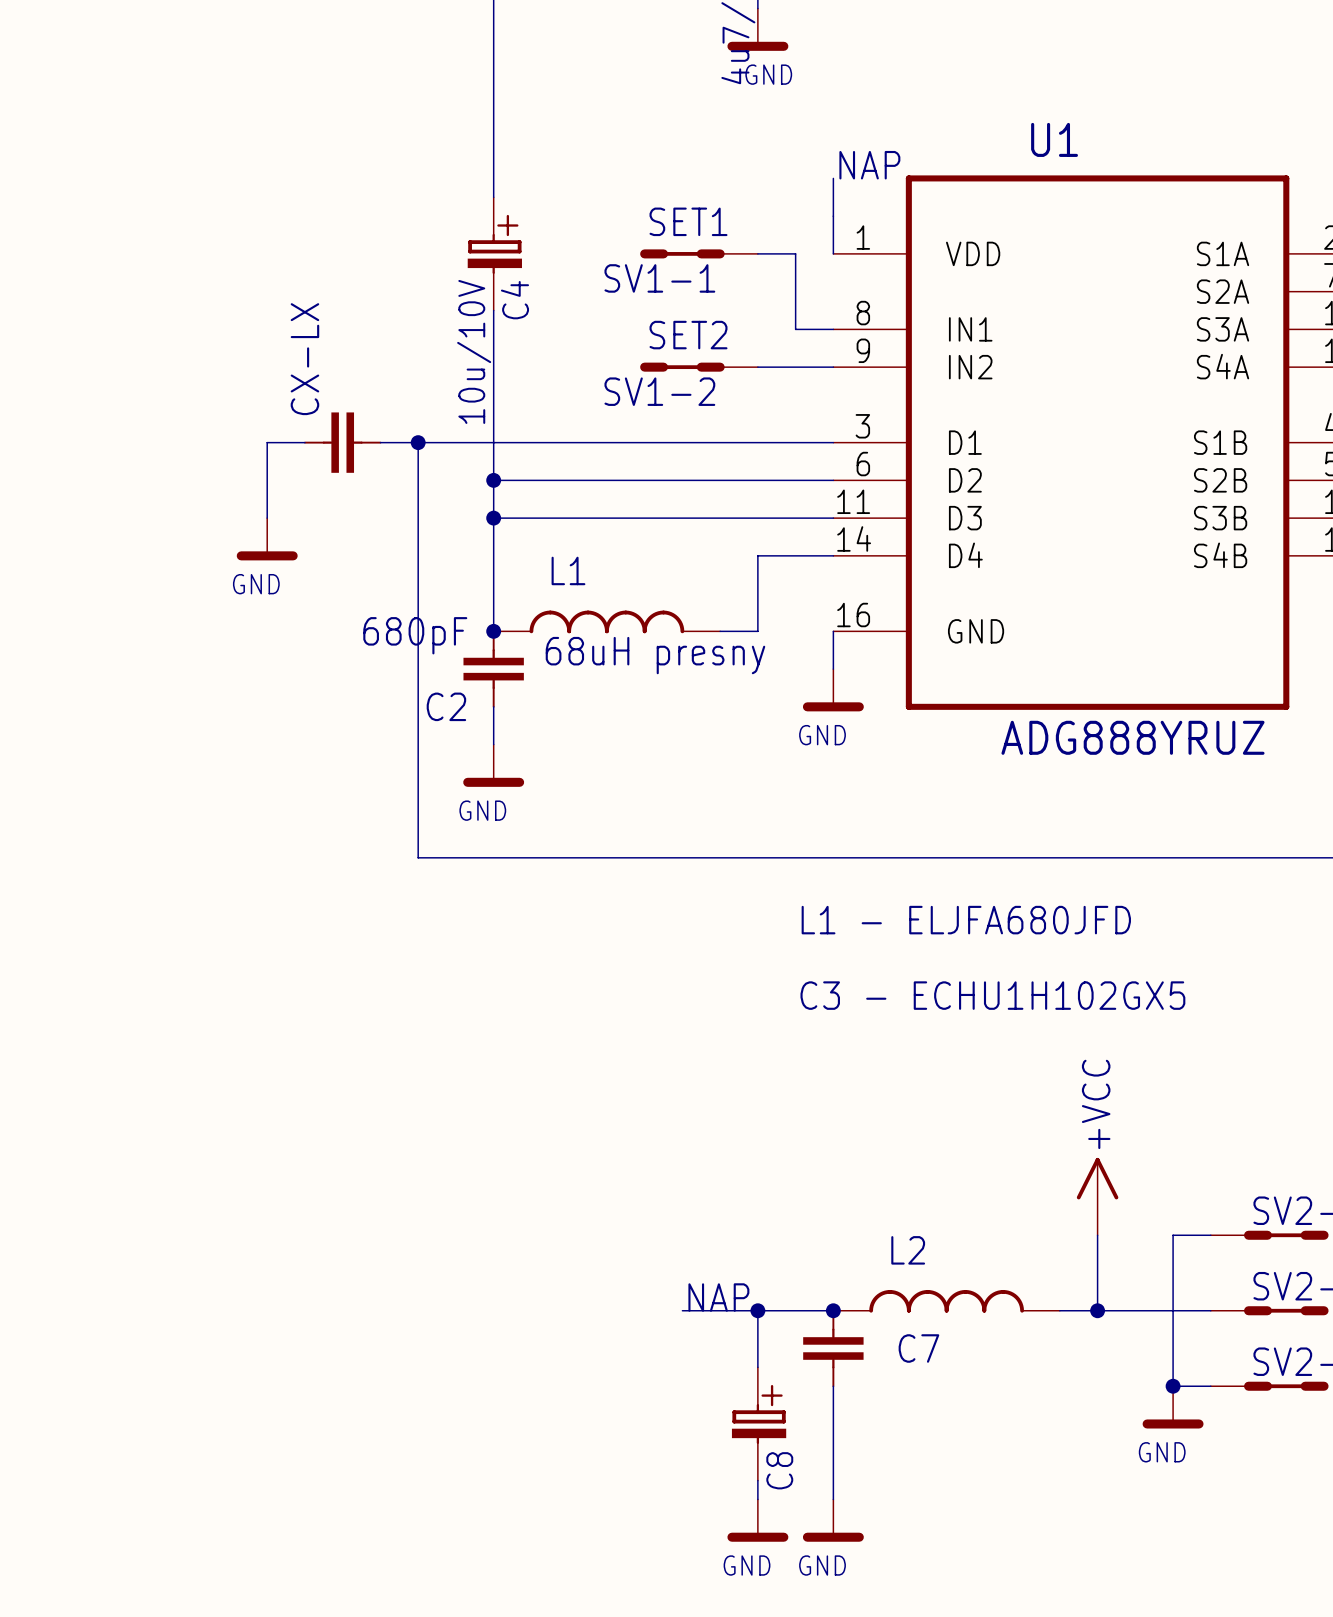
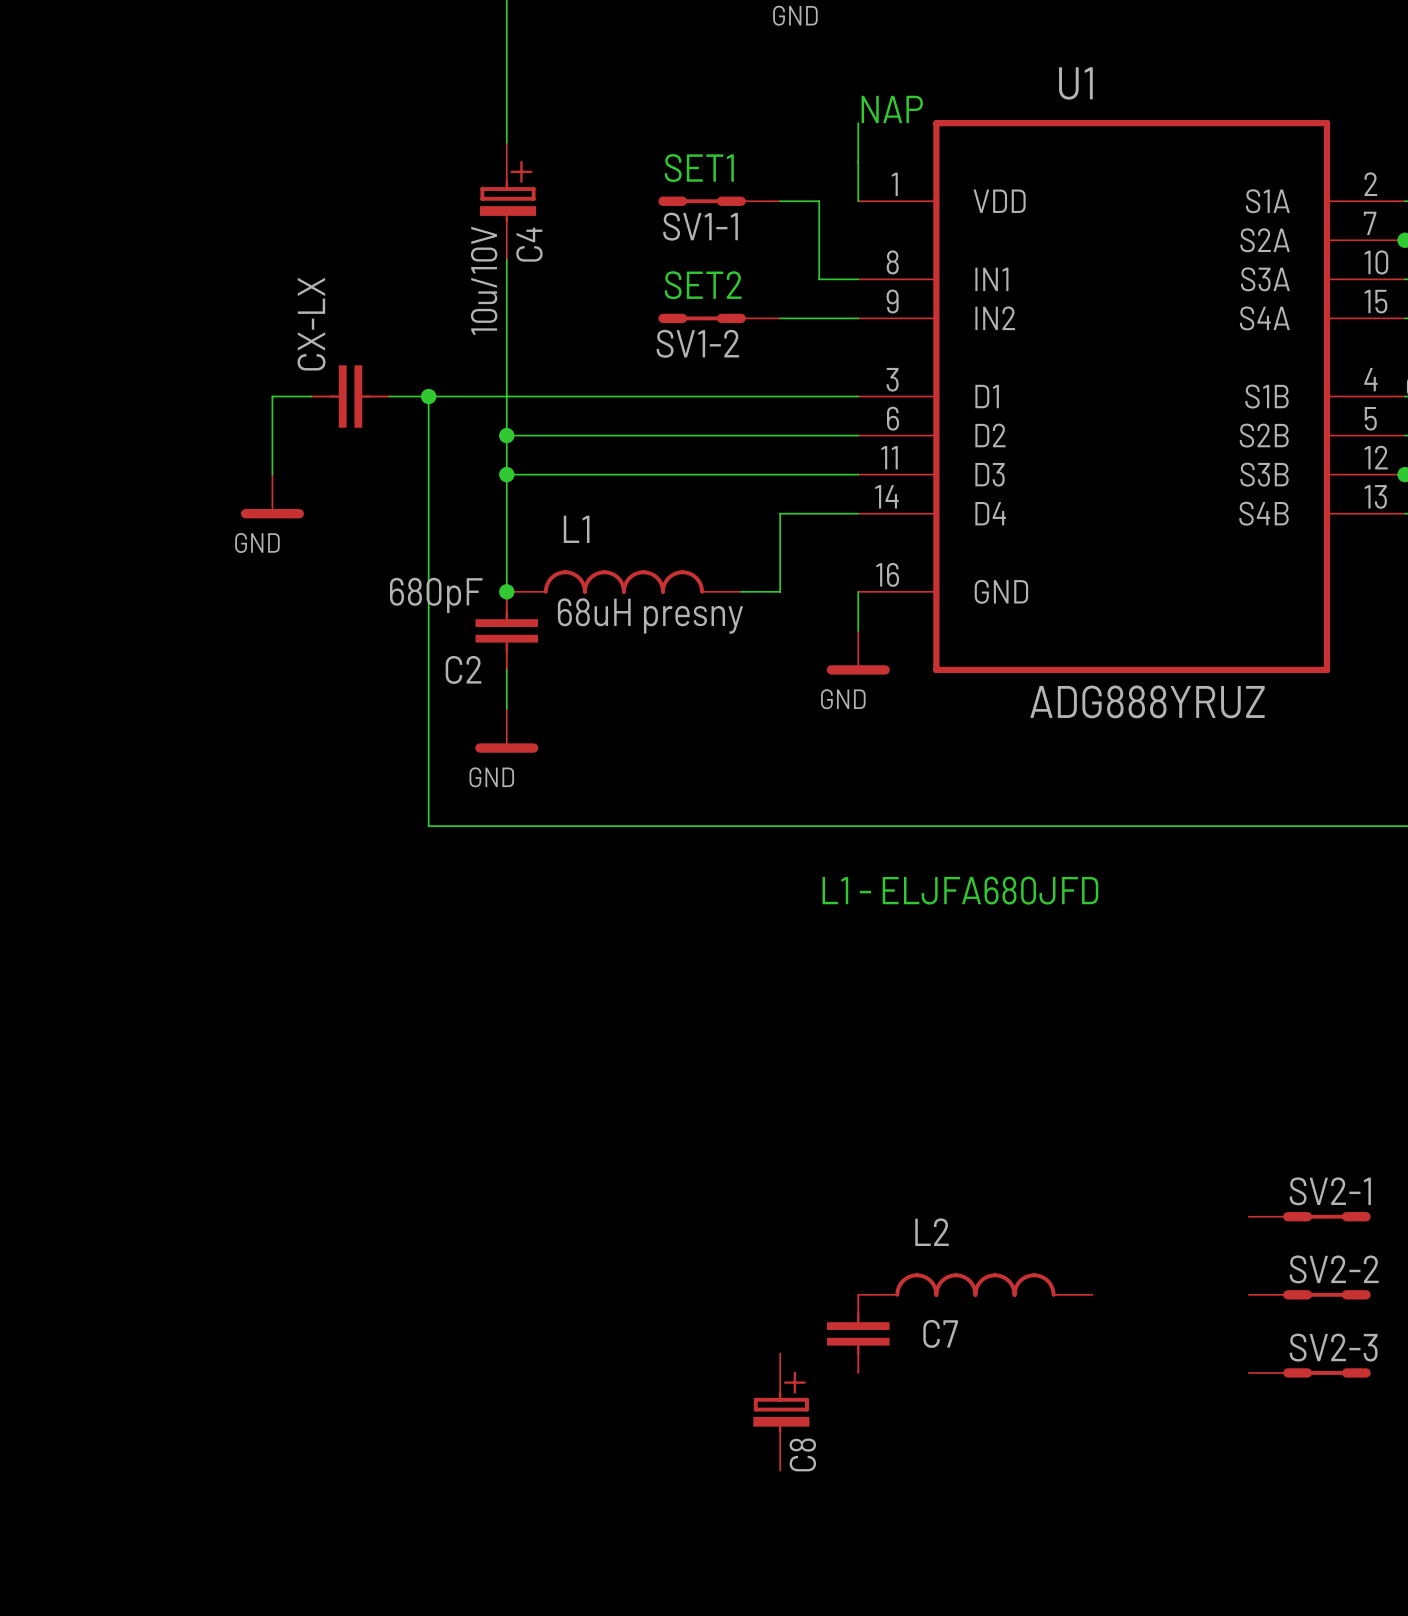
text: C3 - ECHU1H102GX5 (992, 995) -> none
power symbol: +VCC (1097, 1196) -> none
wire: (1097, 1235) (1097, 1310) -> none
wire: (1210, 1235) (1173, 1235) (1173, 1386) (1210, 1386) -> none
text: NAP (718, 1297) -> none
wire: (682, 1310) (833, 1310) -> none
wire: (757, 1310) (757, 1367) -> none
junction: (757, 1310) -> none
junction: (833, 1310) -> none
wire: (1059, 1310) (1210, 1310) -> none
junction: (1097, 1310) -> none
wire: (833, 1386) (833, 1499) -> none
junction: (1173, 1386) -> none
power symbol: (1173, 1407) -> none
wire: (757, 1480) (757, 1499) -> none
power symbol: (757, 1520) -> none
power symbol: (833, 1520) -> none

